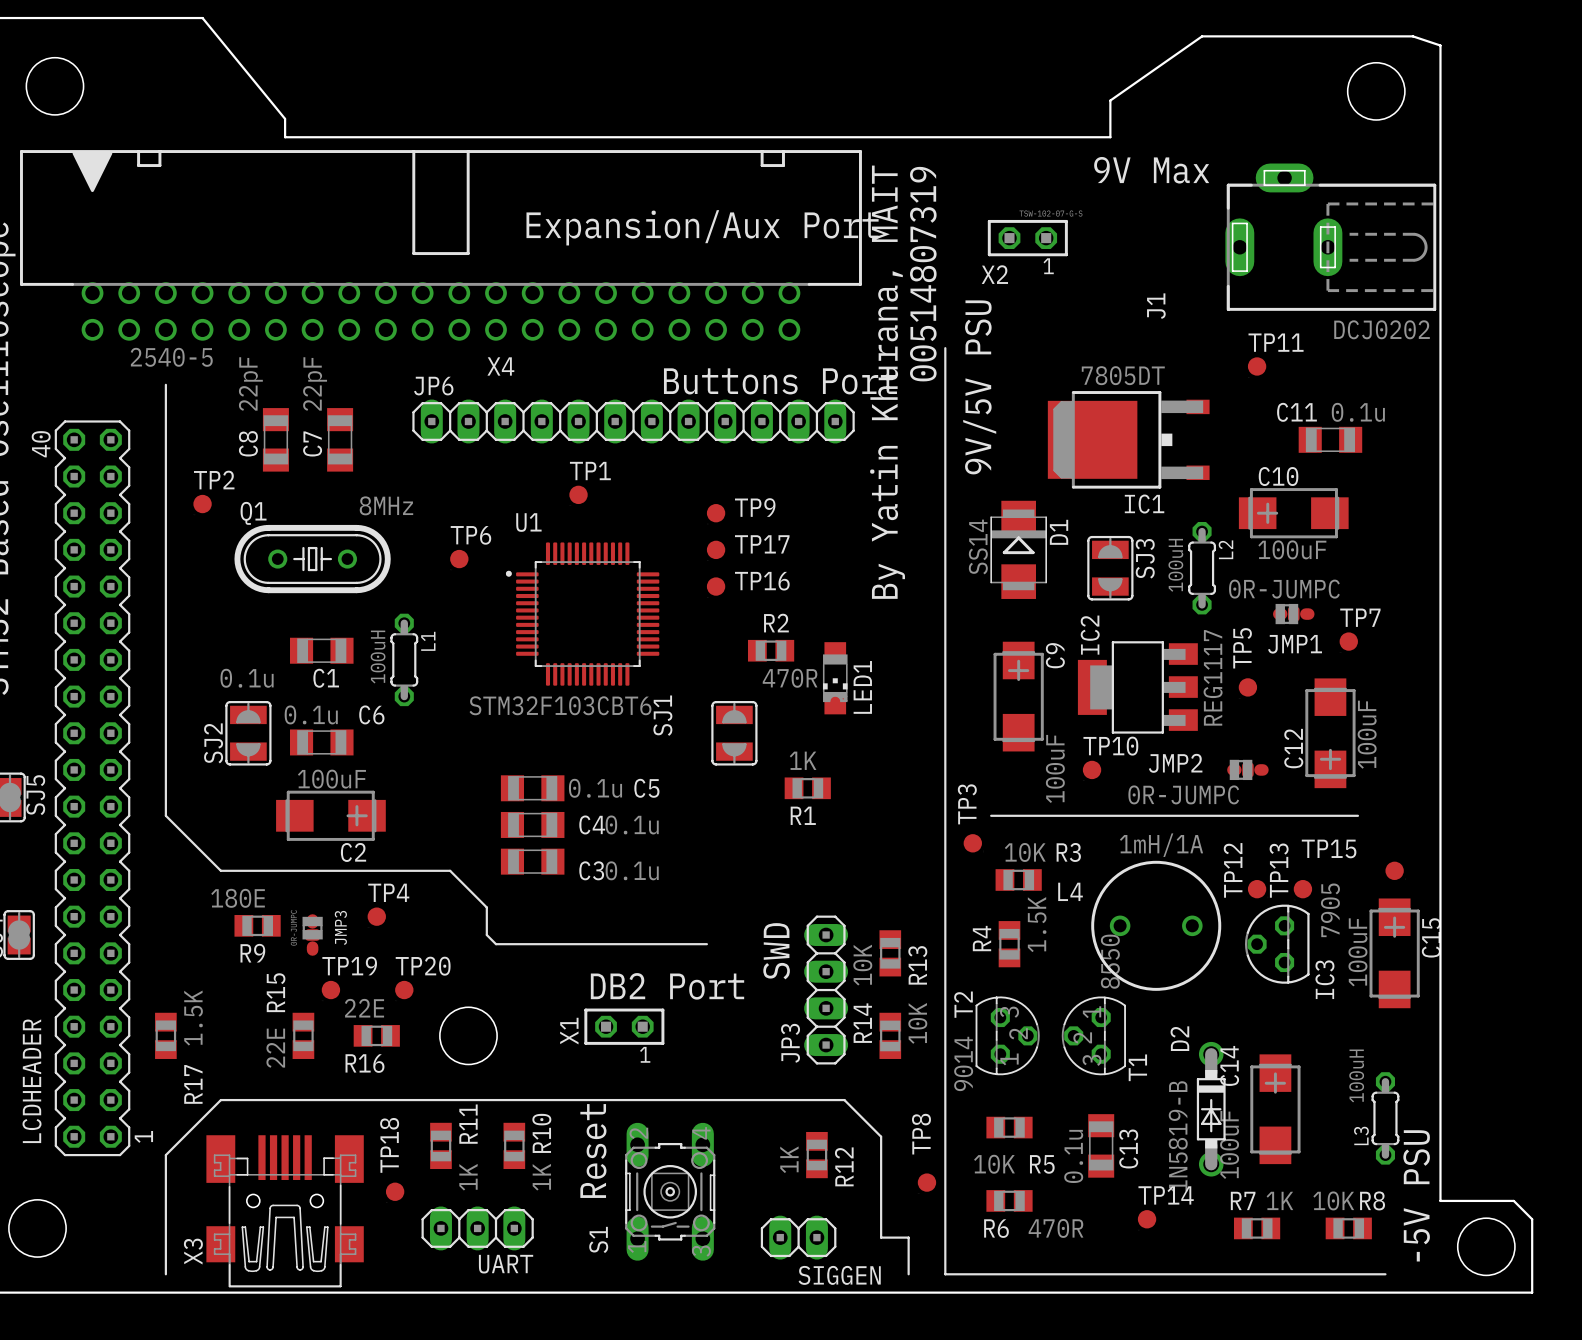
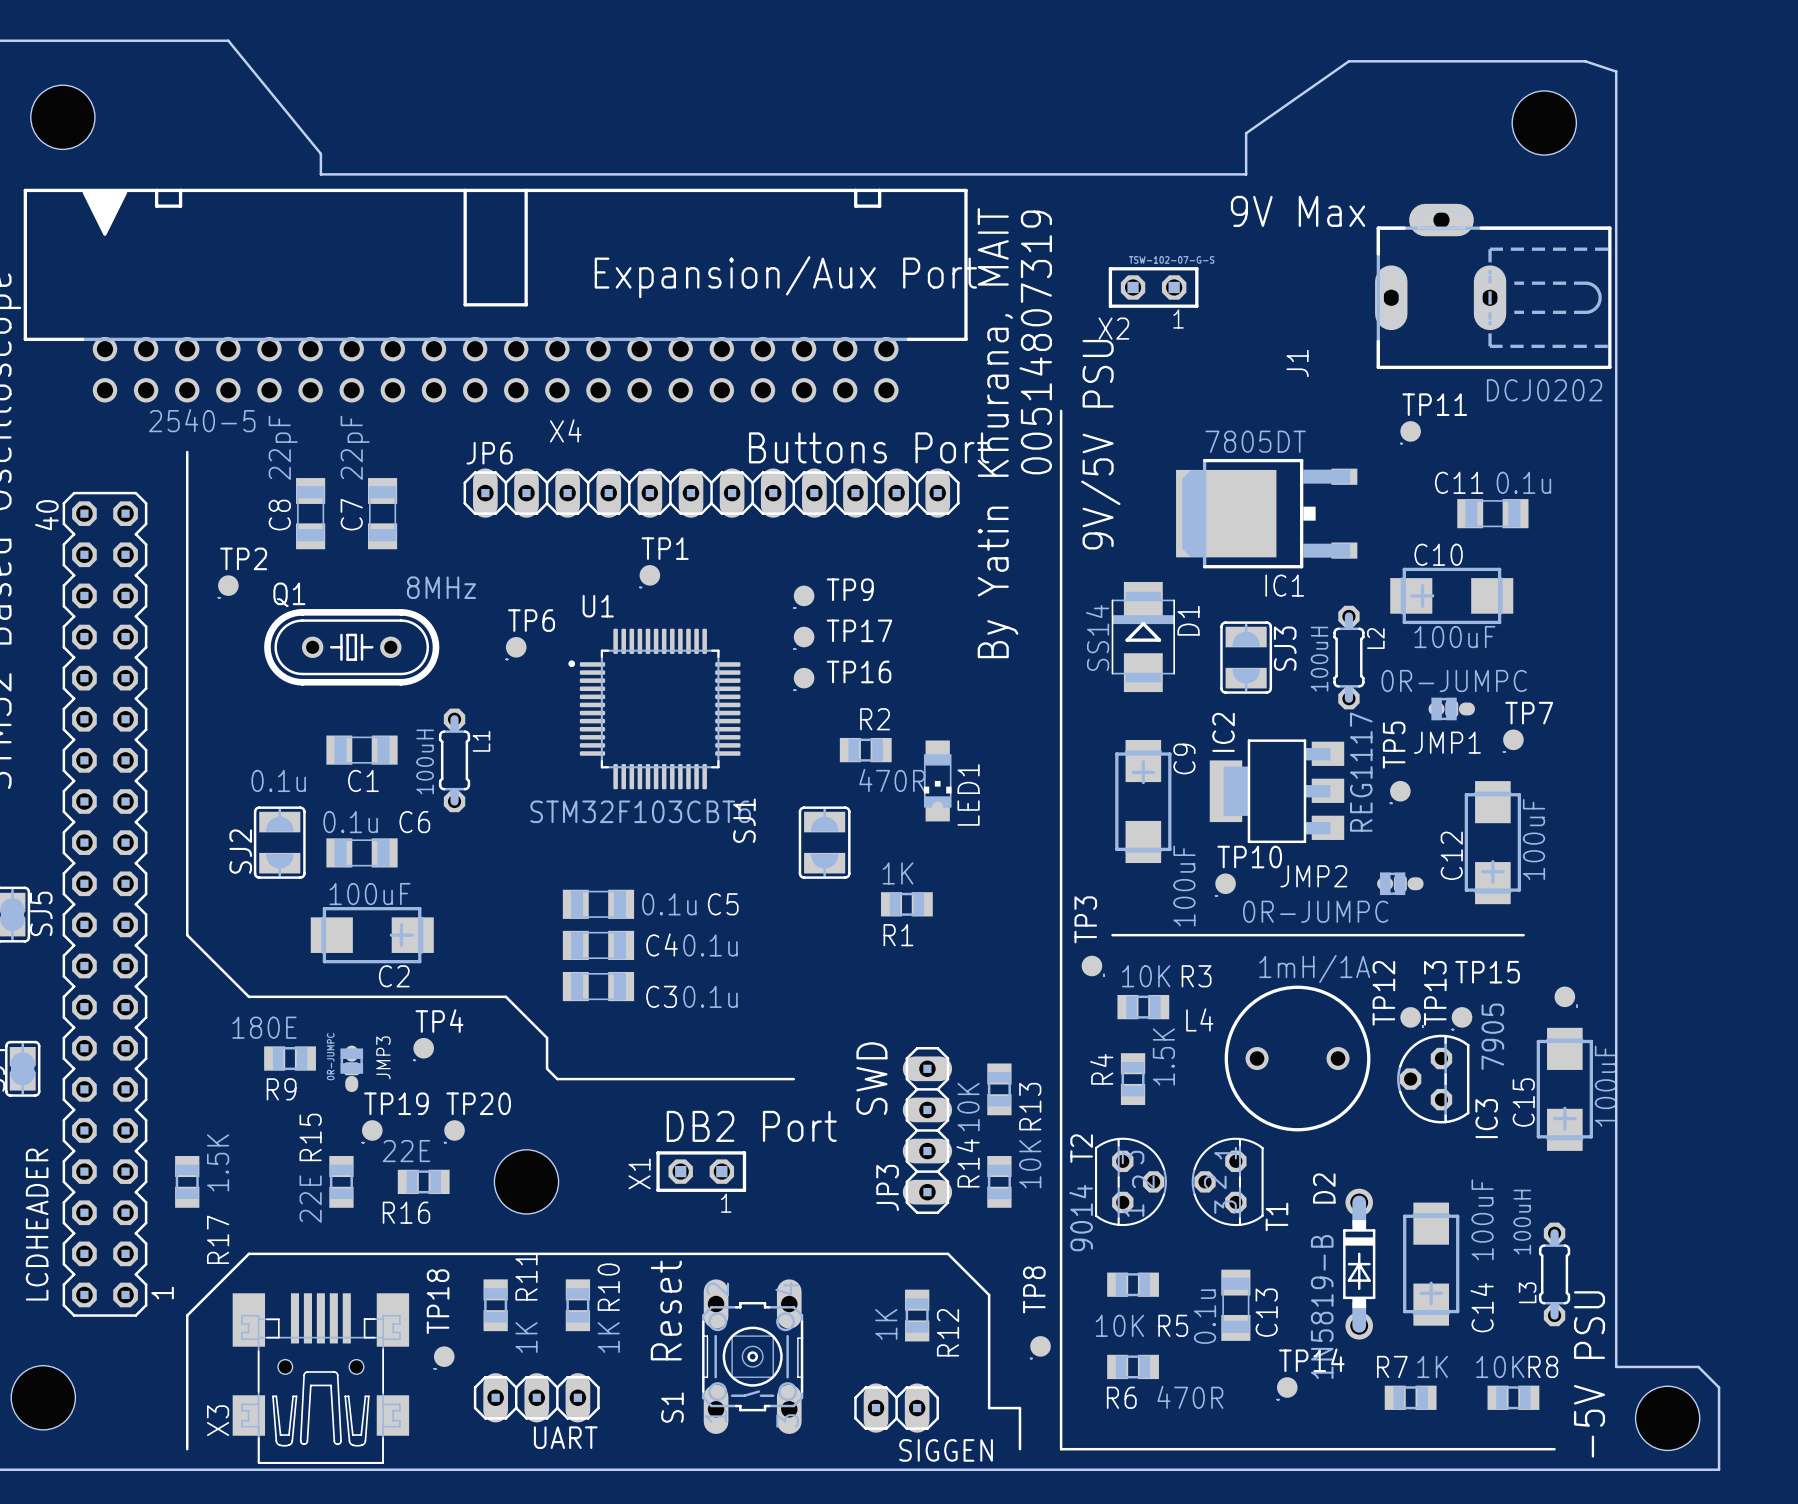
C15 rotation: 0° (1394, 953) -> 180° (1564, 1089)
T1 value: 8550 (1110, 961) -> none
C14 rotation: 0° (1275, 1109) -> 180° (1431, 1264)

